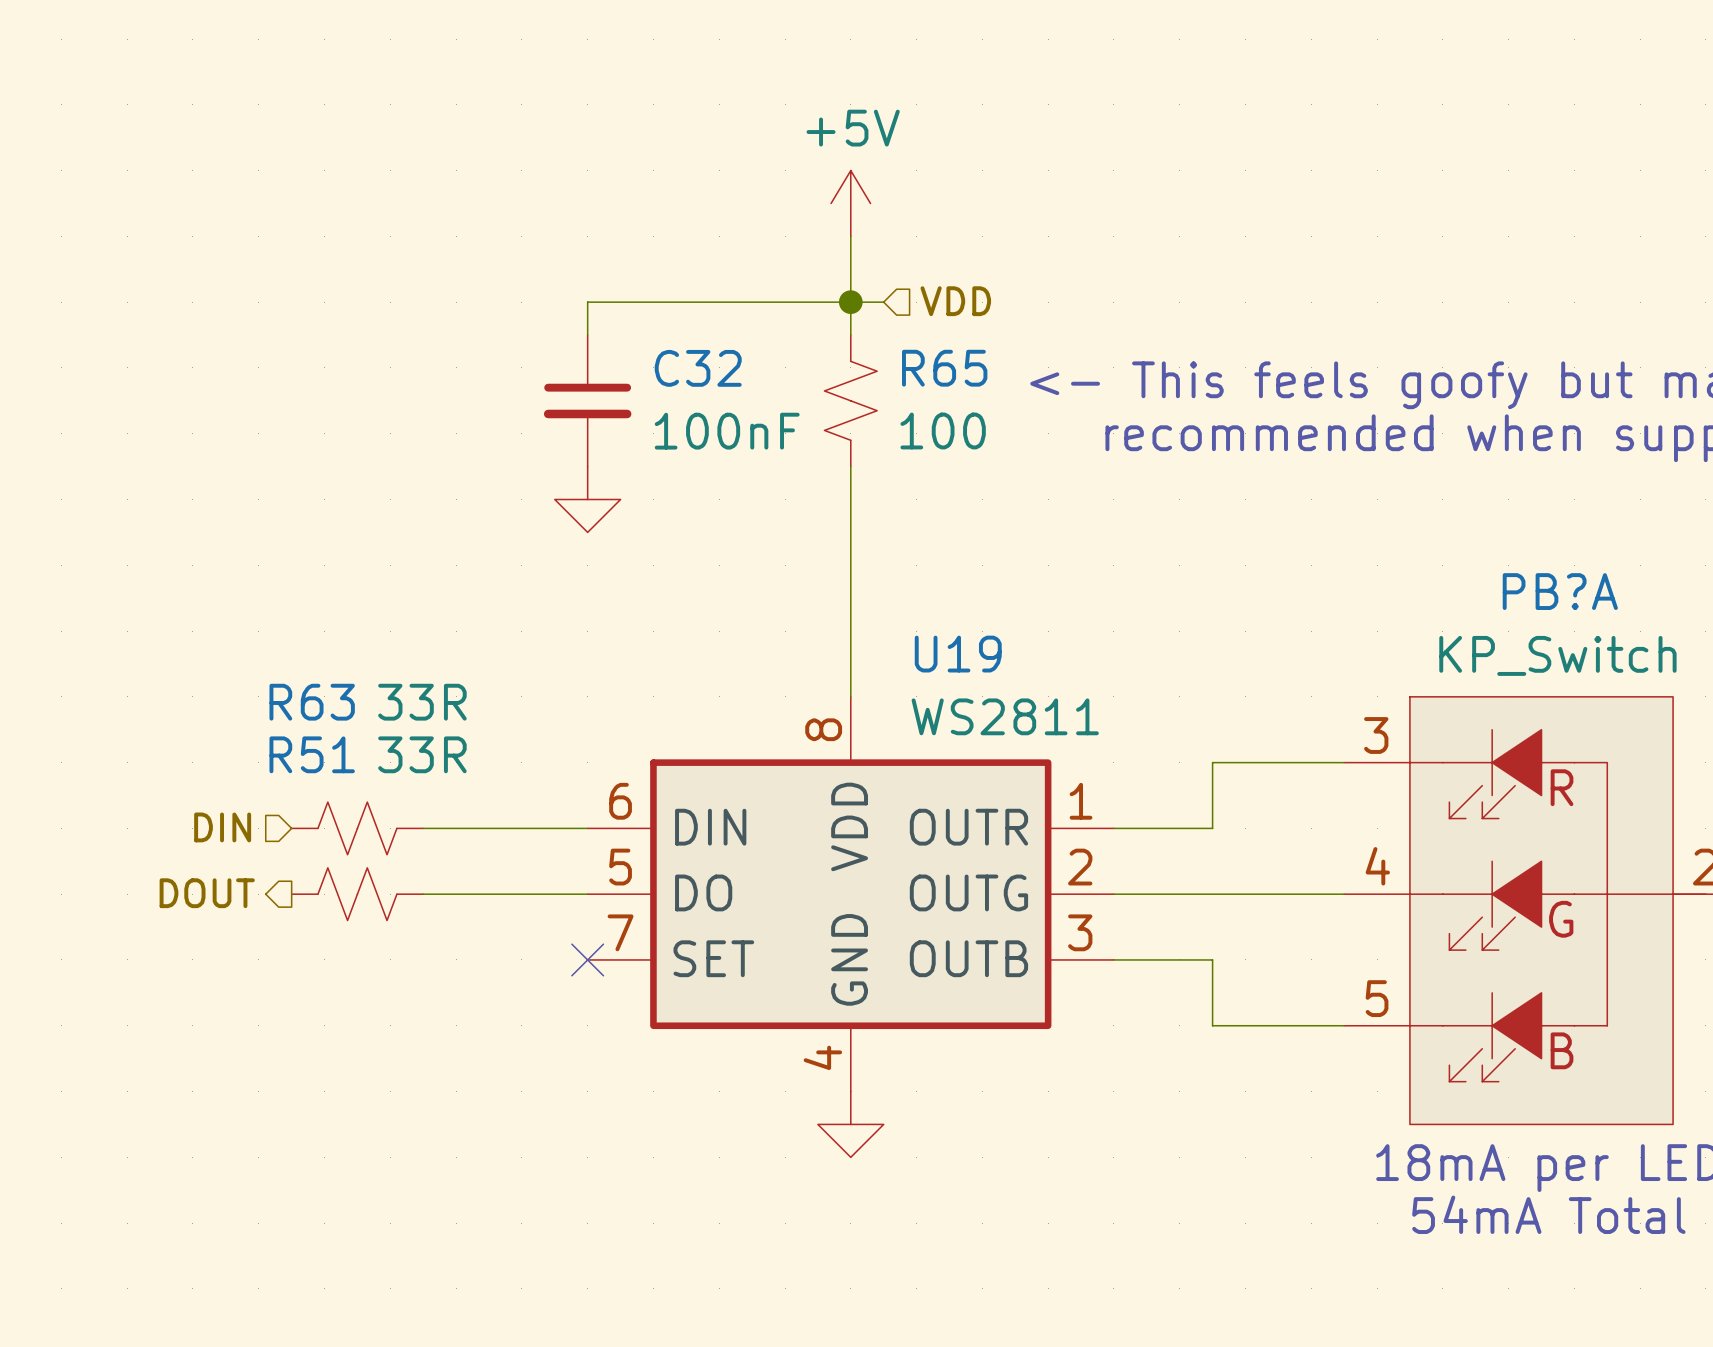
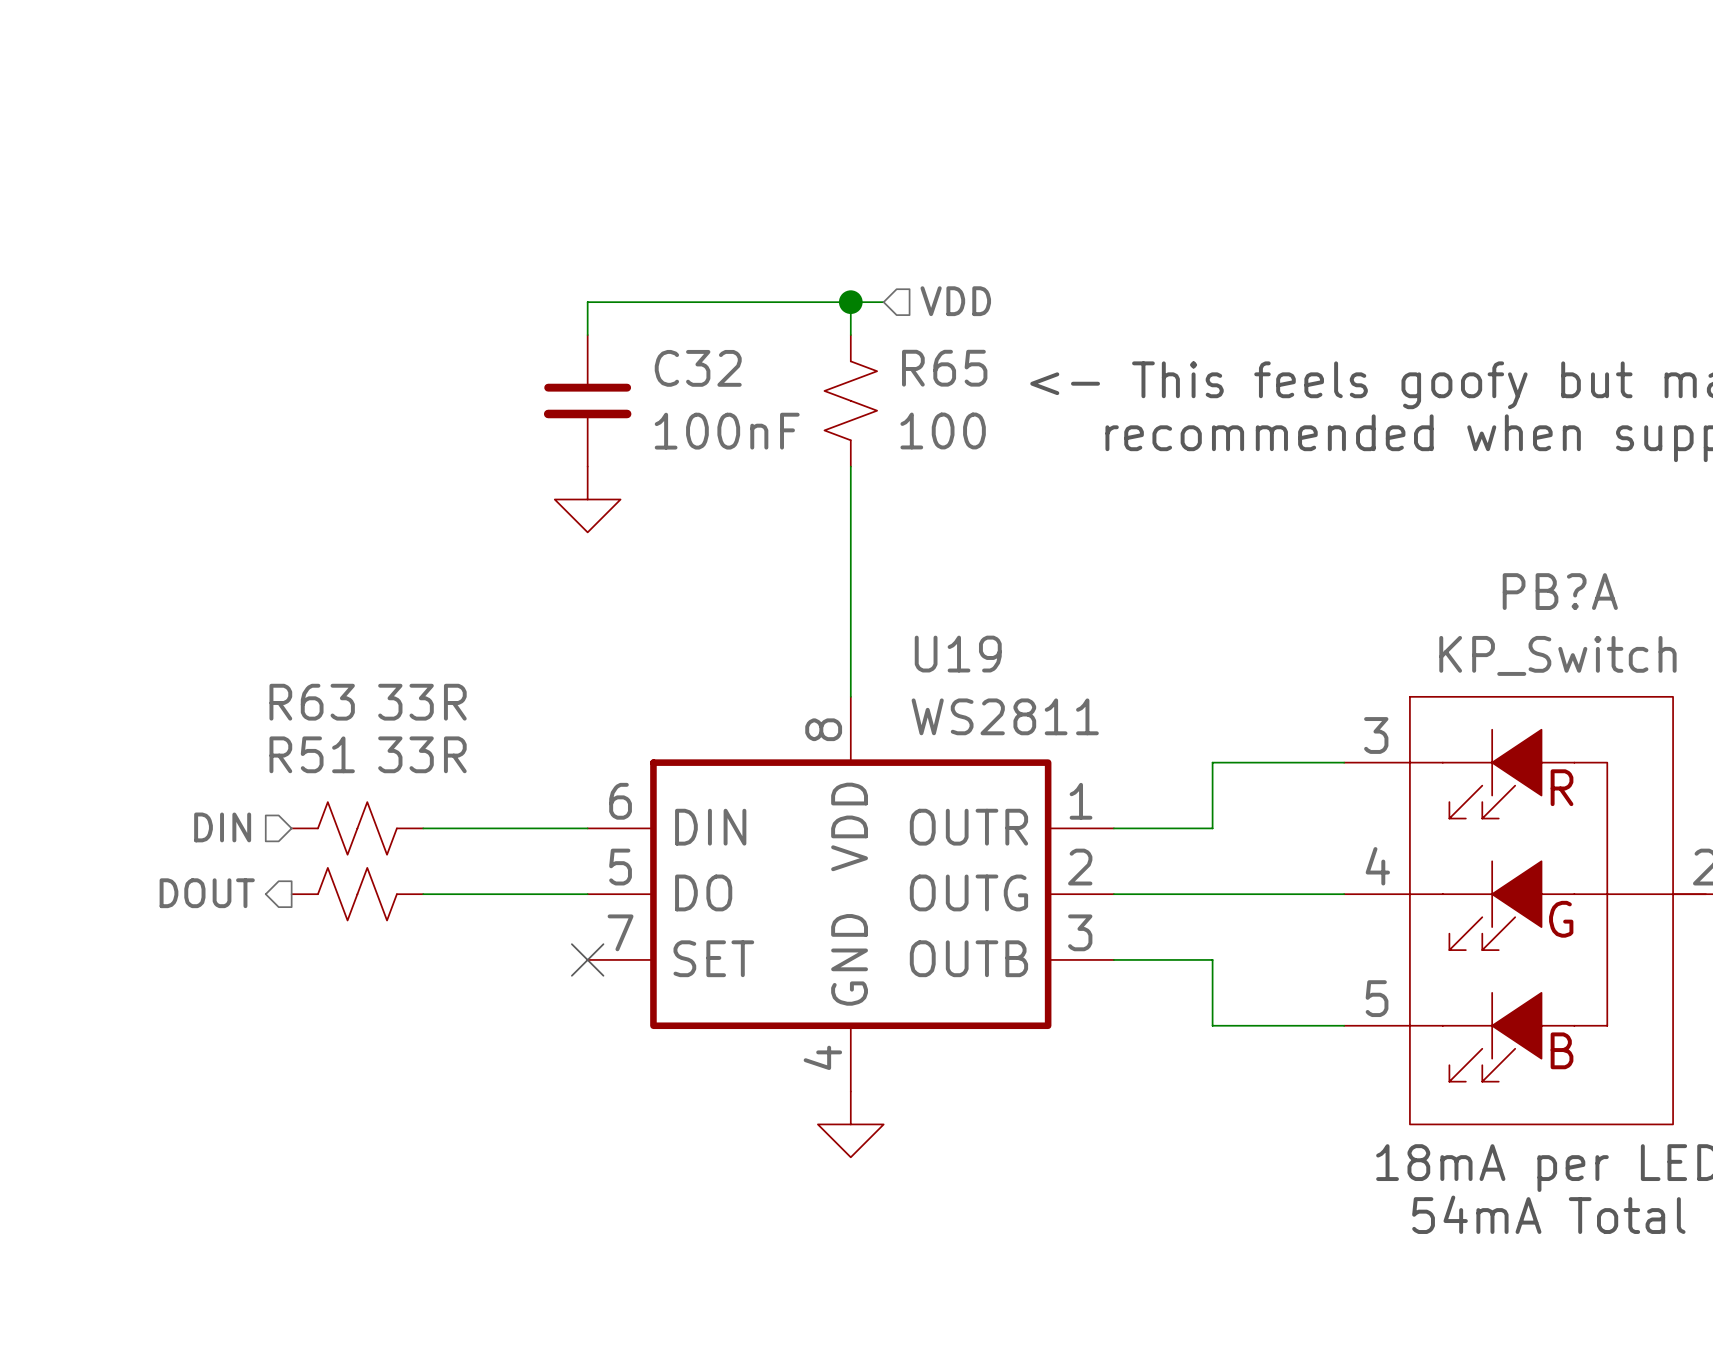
power symbol: +5V (850, 203) -> none
wire: (850, 236) (850, 302) -> none

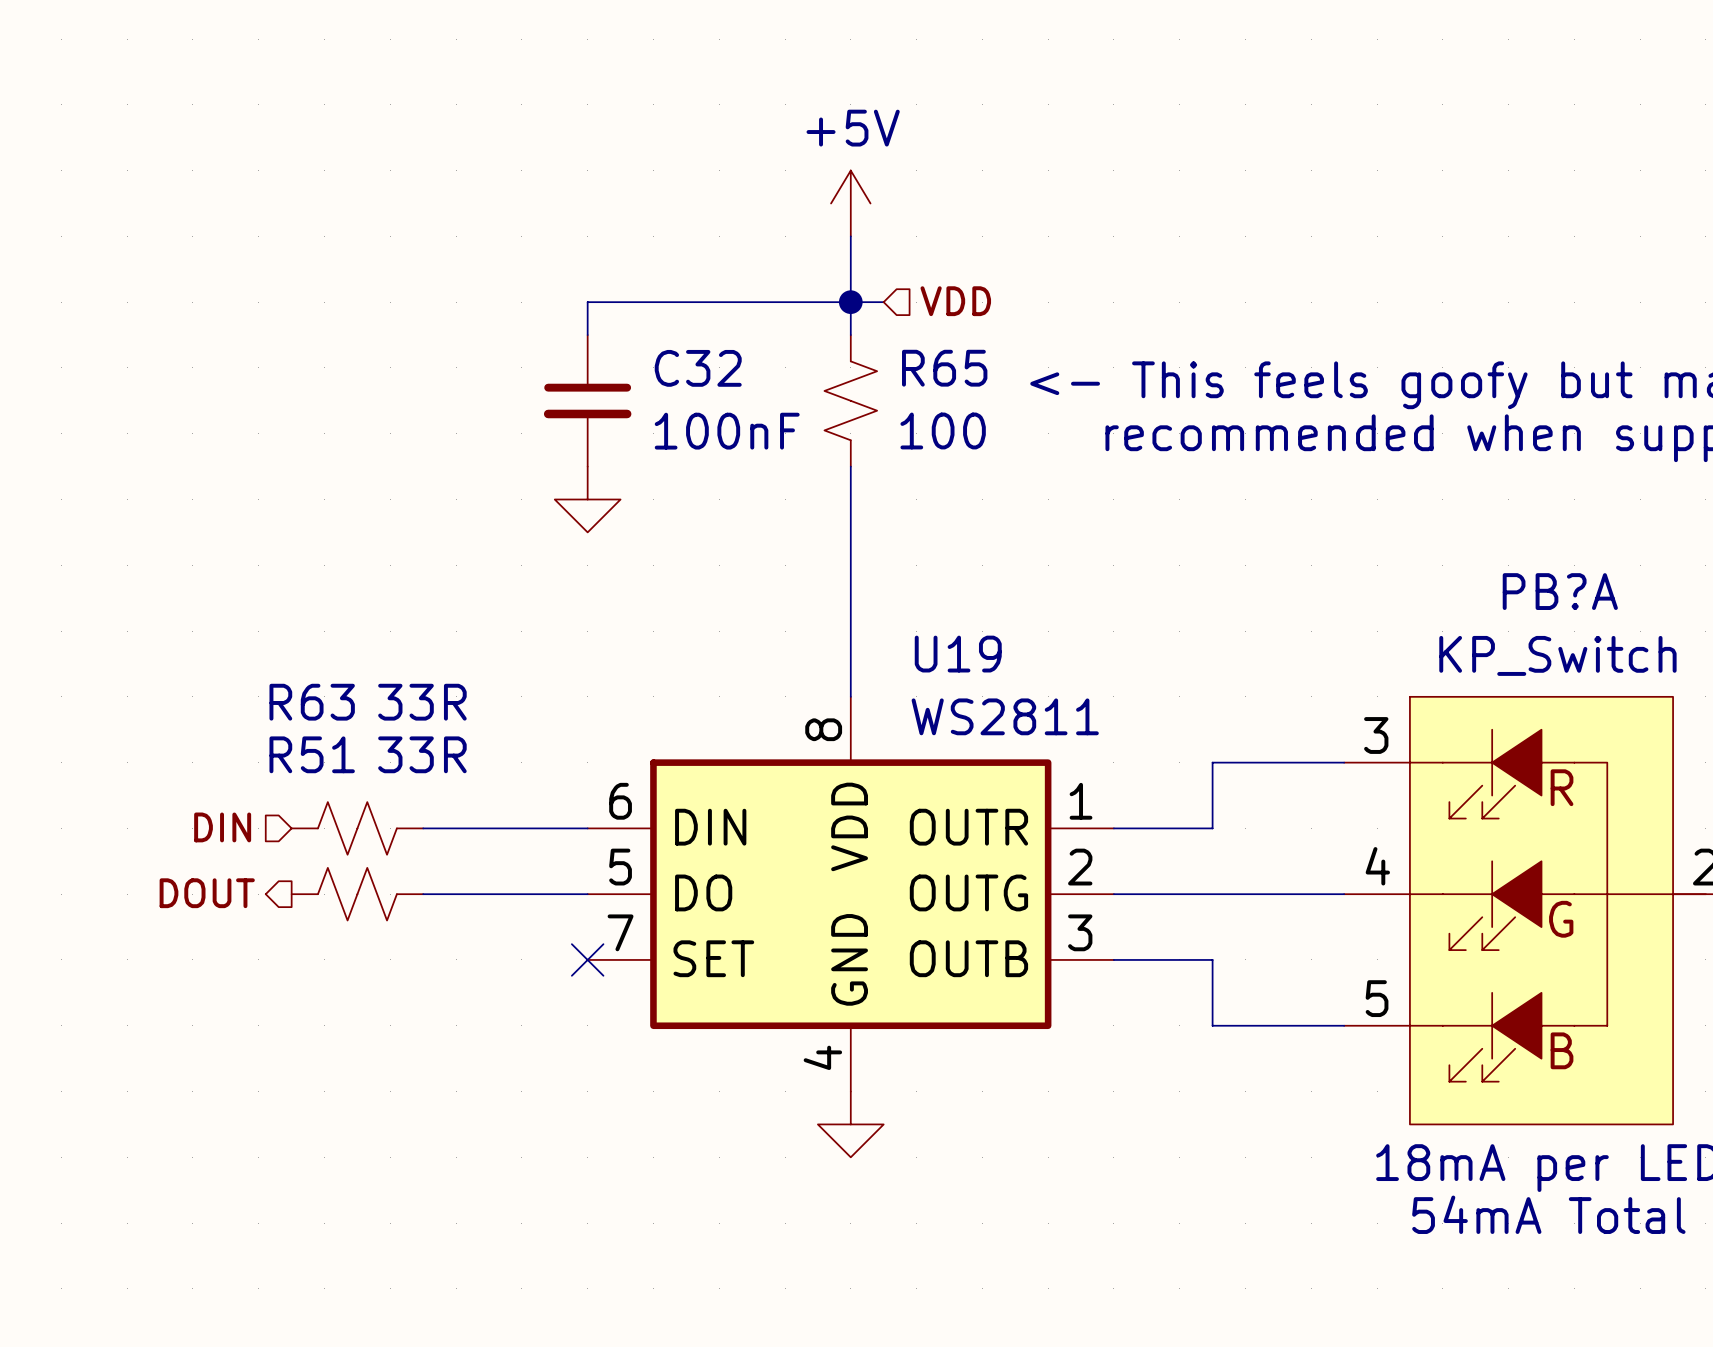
power symbol: none -> +5V (850, 203)
wire: none -> (850, 236) (850, 302)

